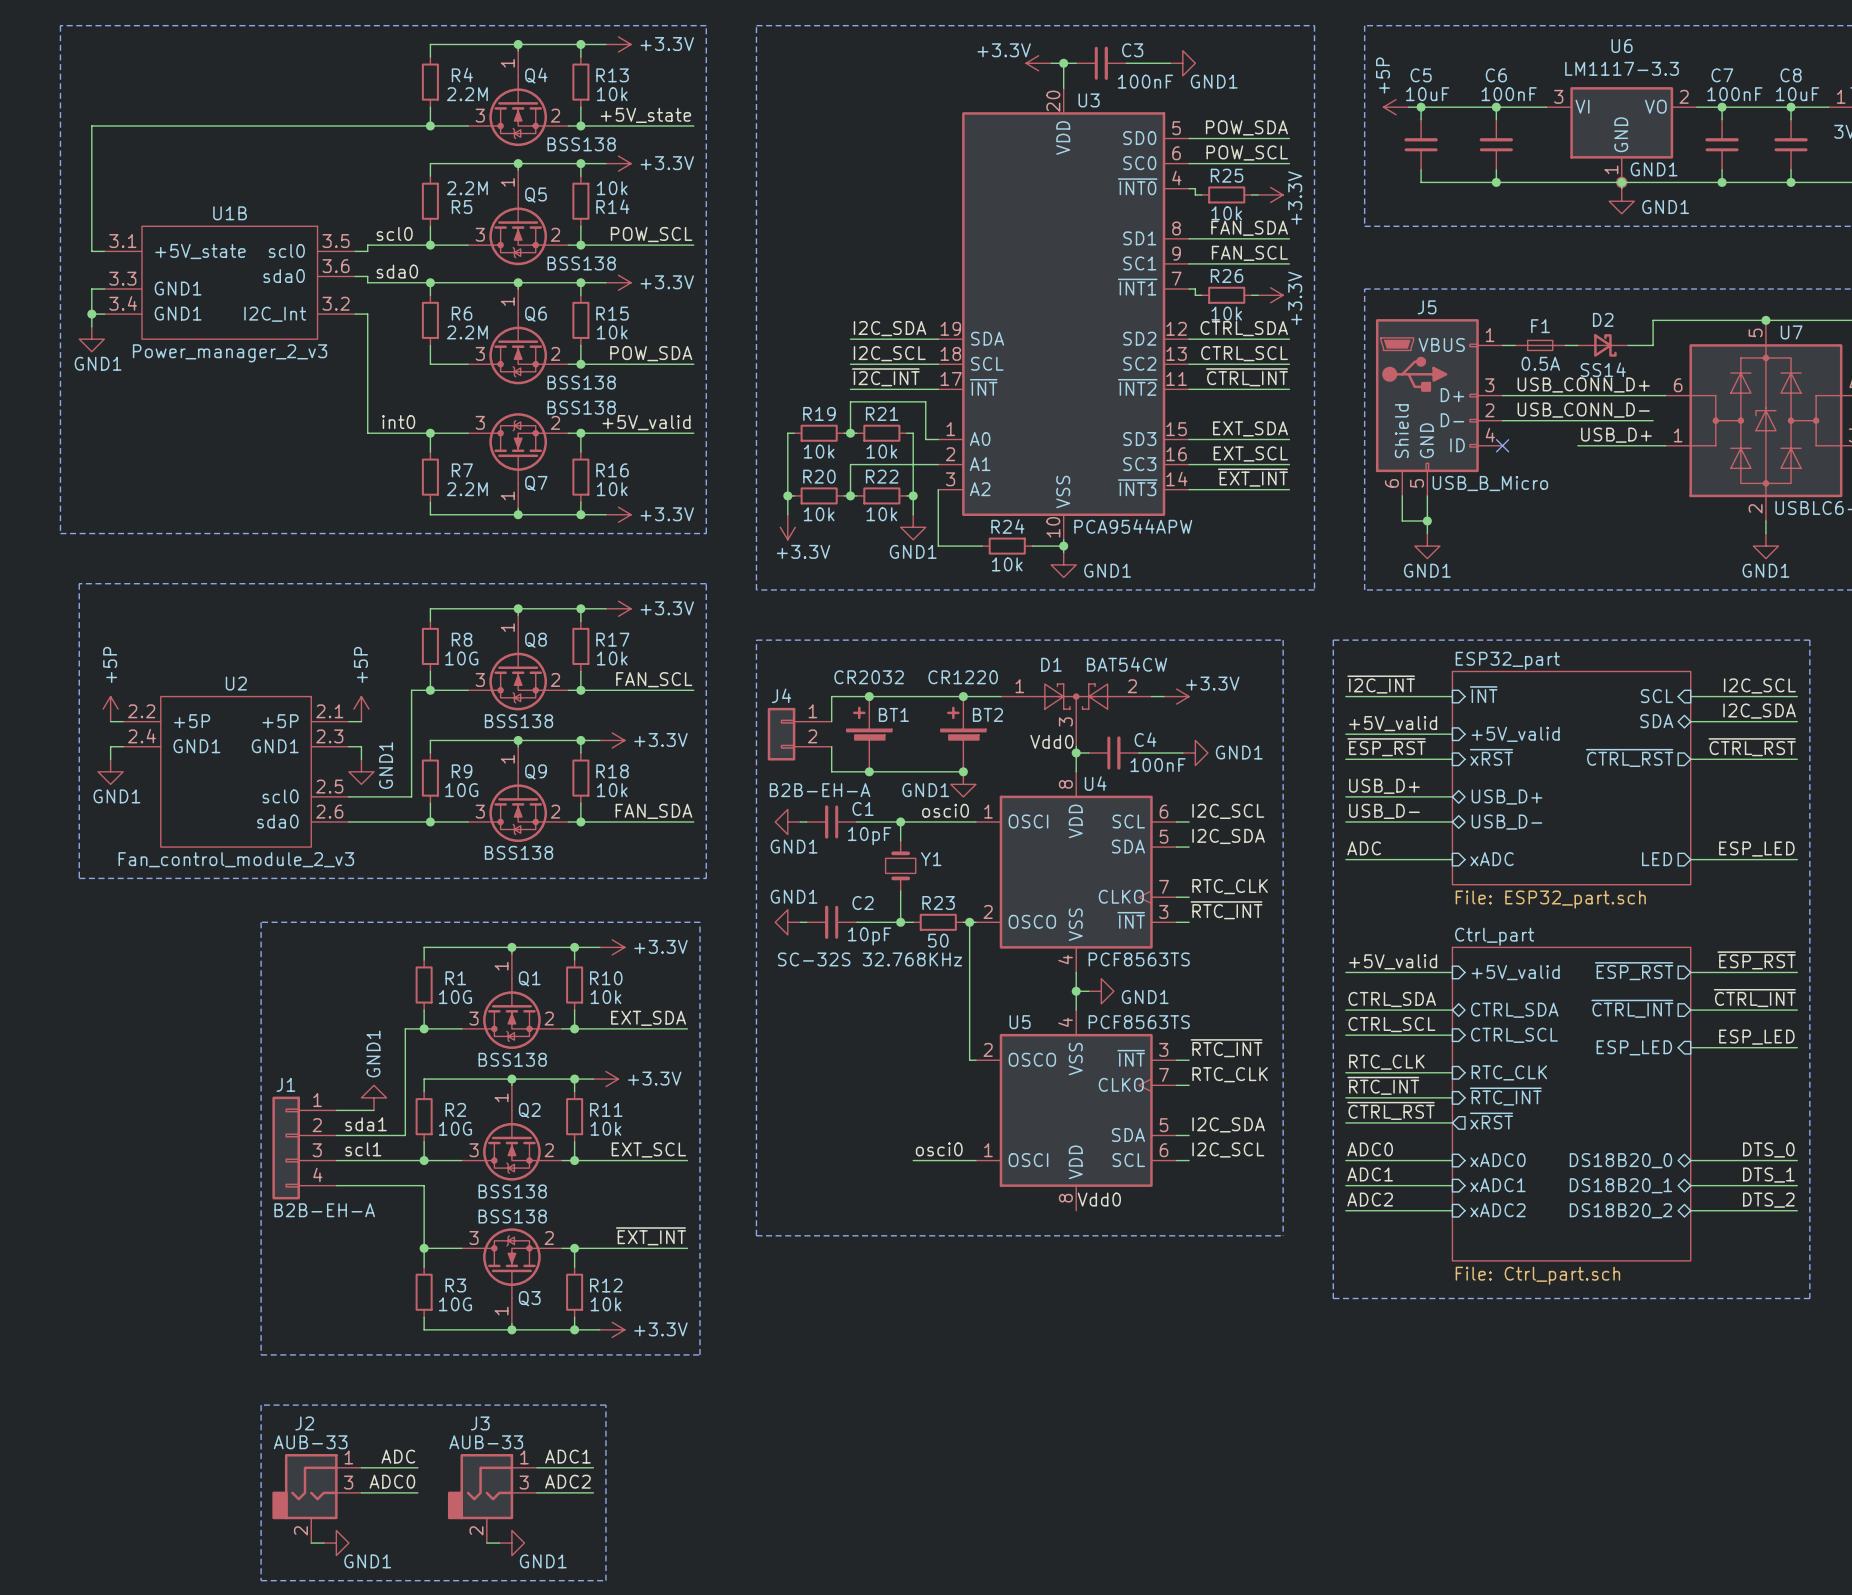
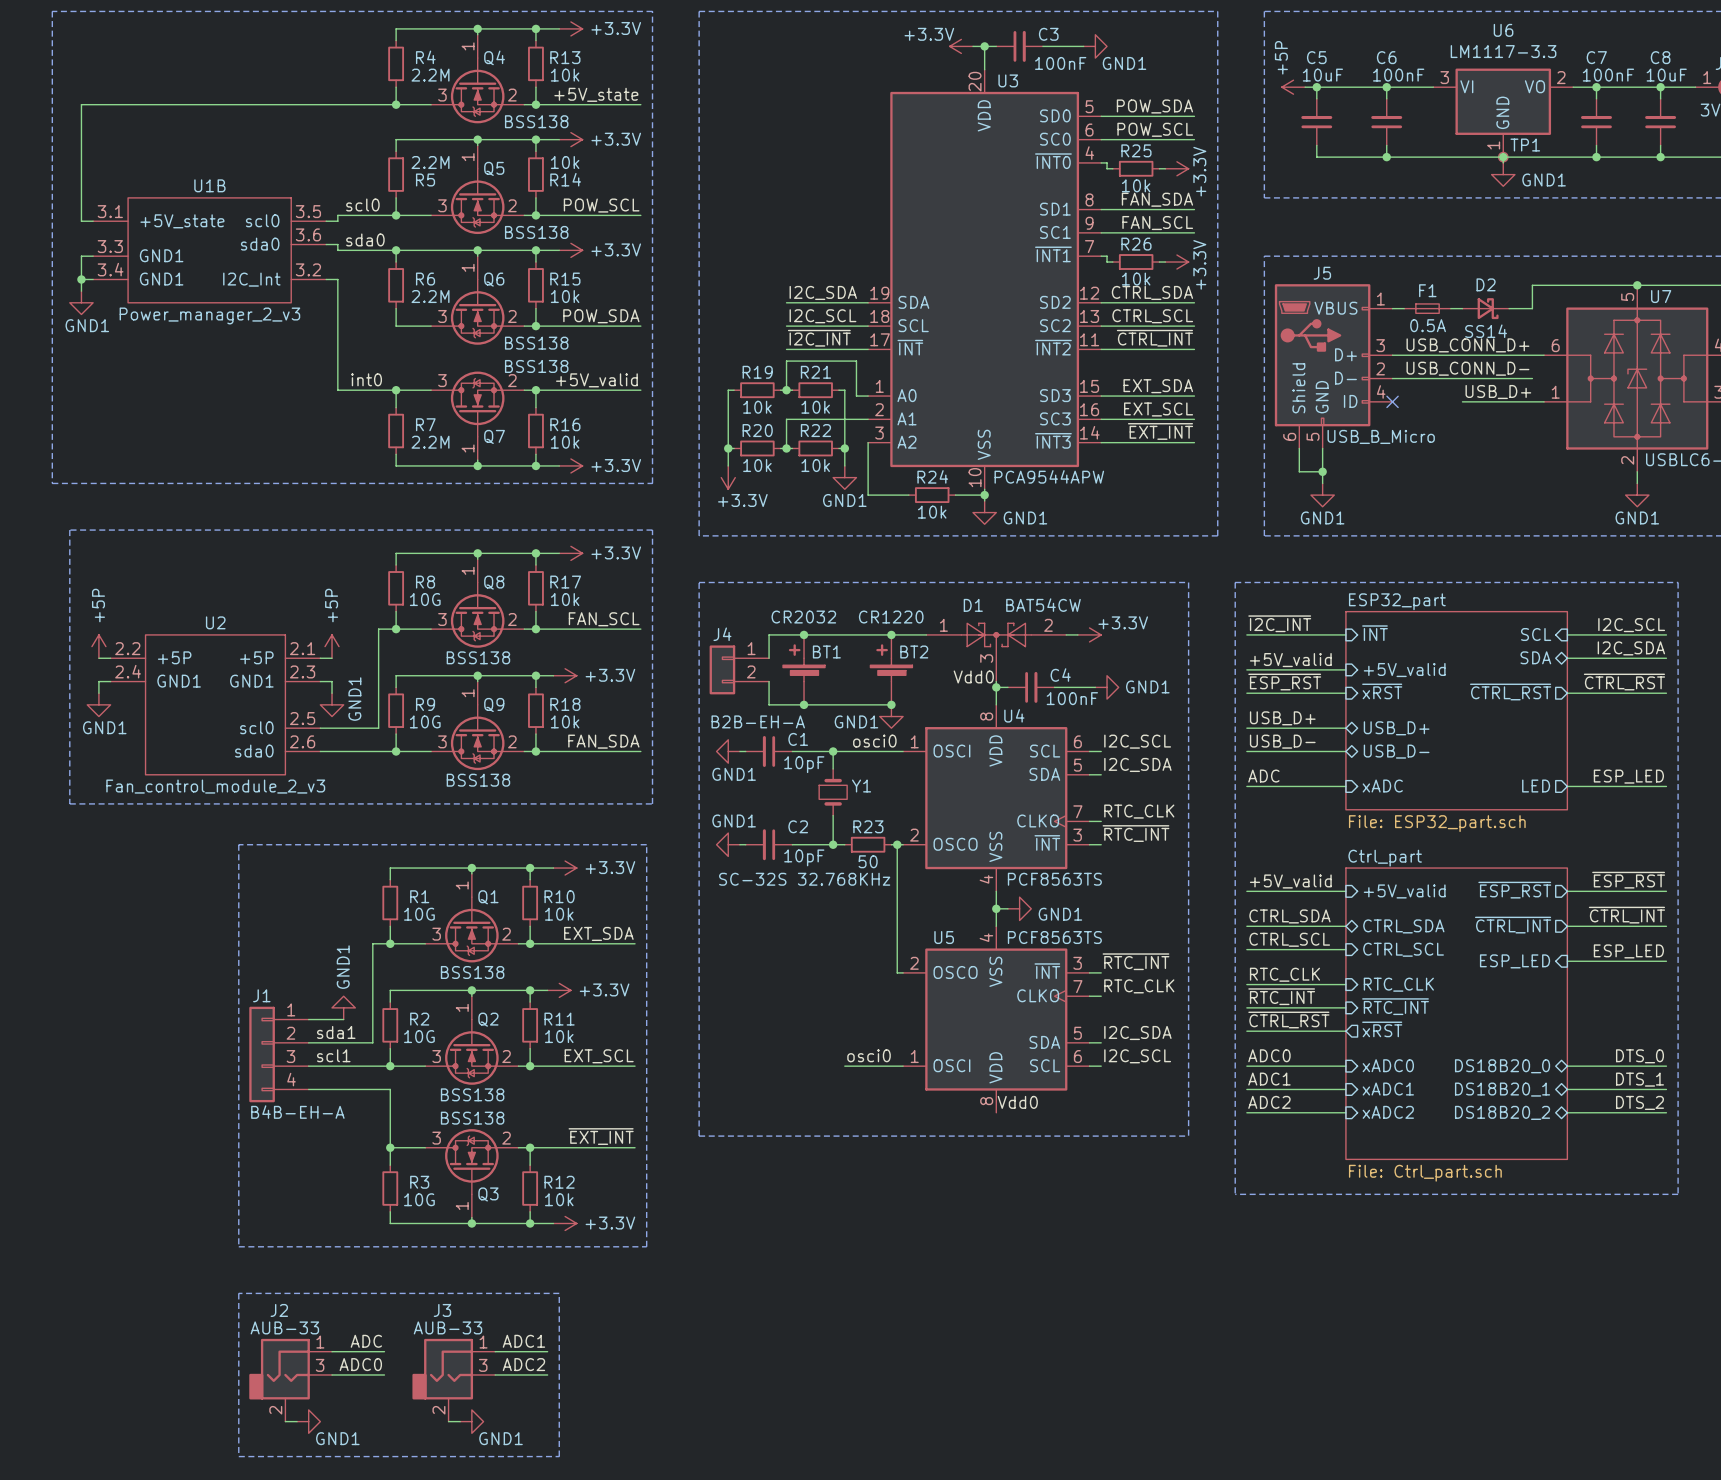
GND1 name: GND1 (1654, 169) -> TP1 (1525, 145)
J1 value: B2B-EH-A (324, 1210) -> B4B-EH-A (297, 1112)

